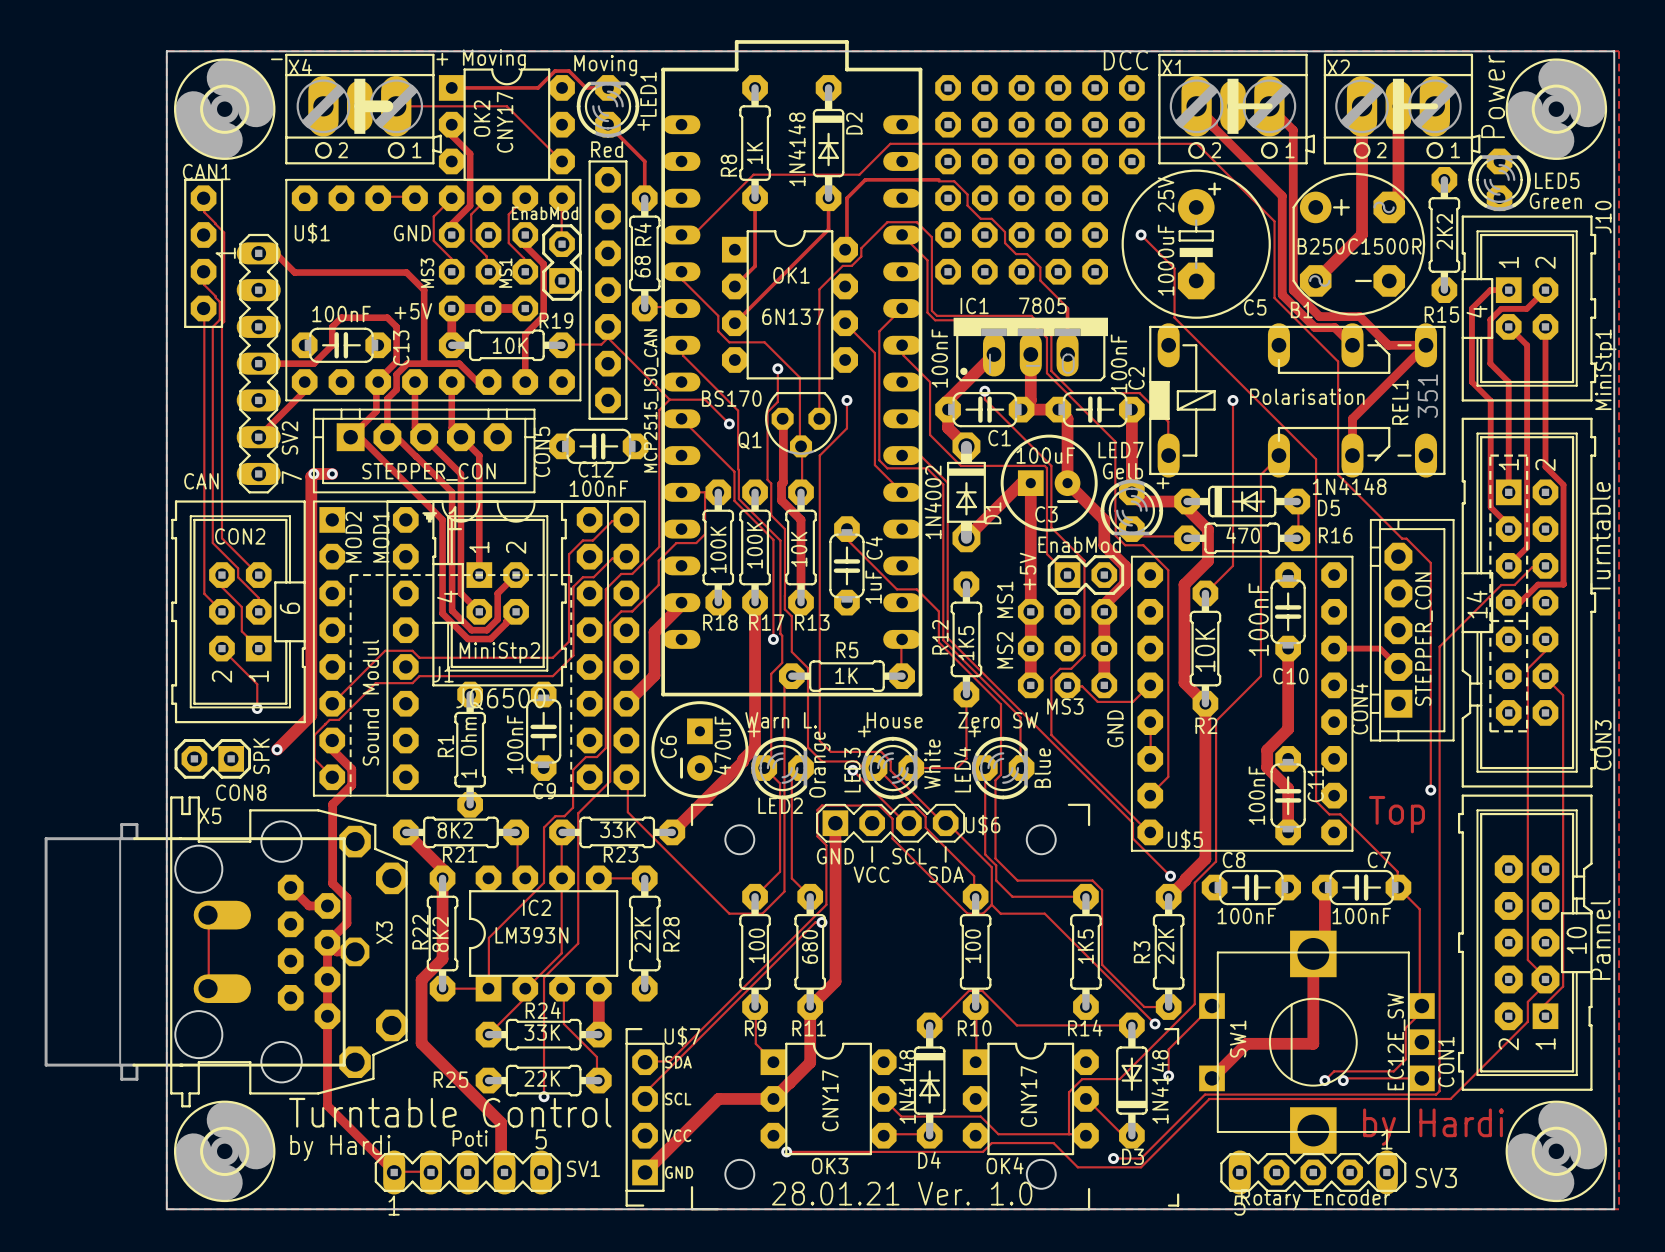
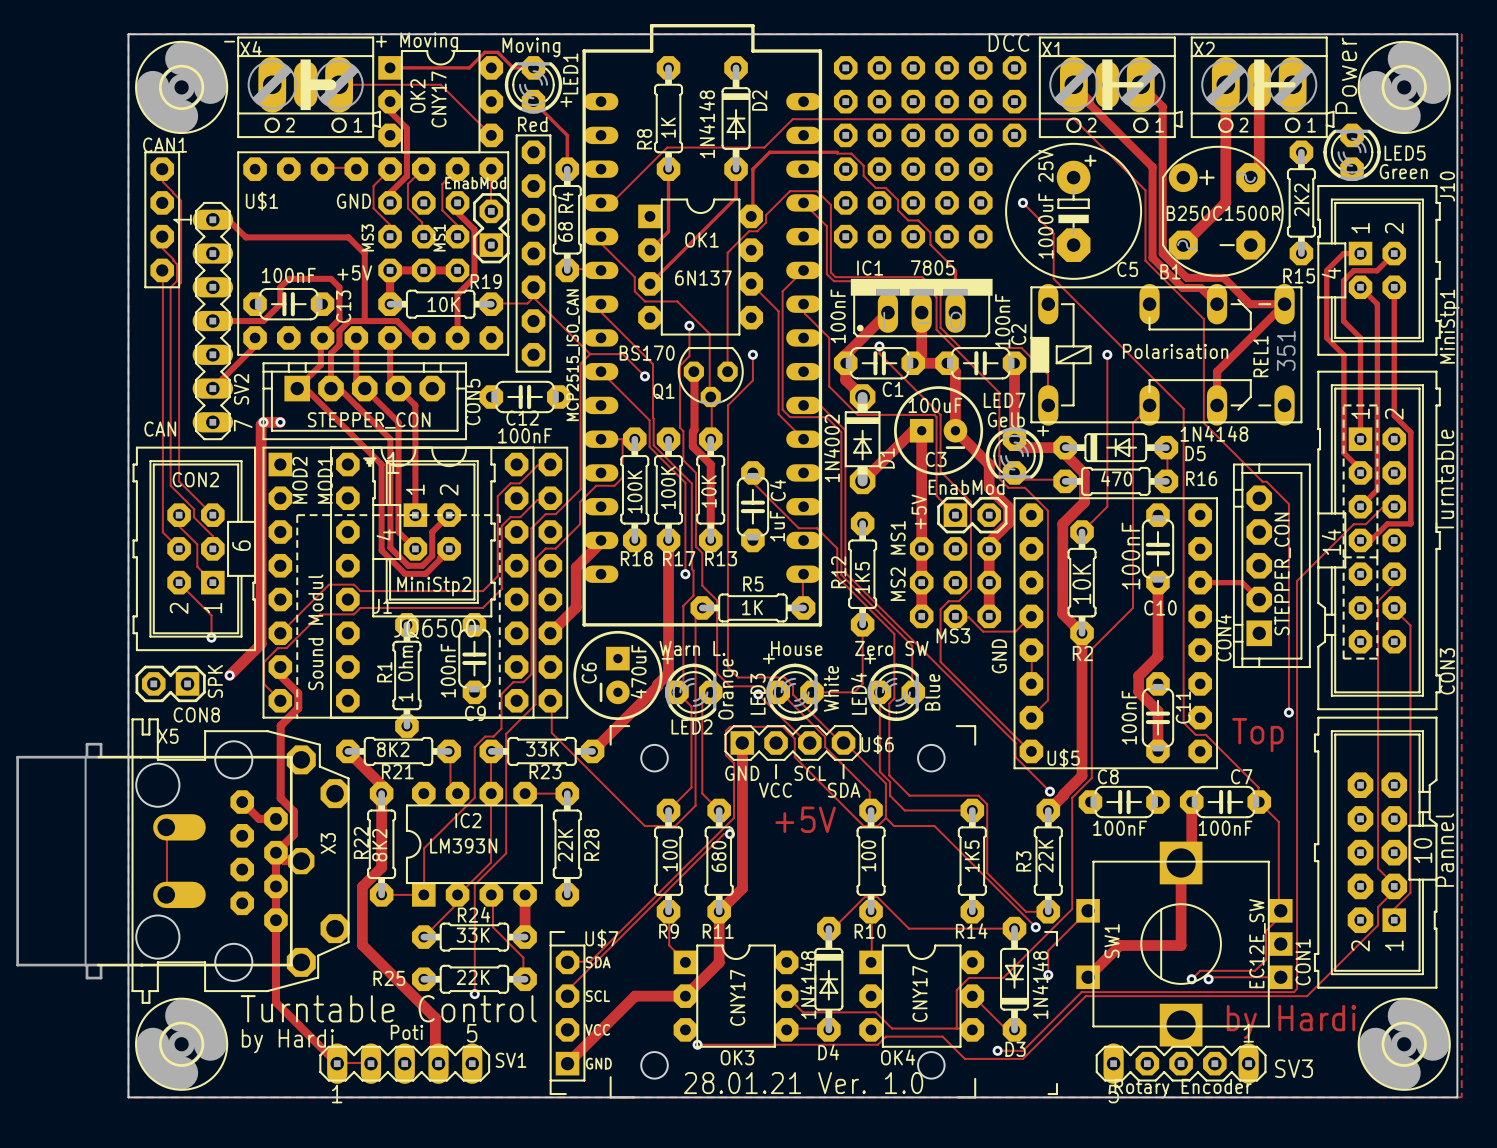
text: none -> +5V (805, 819)

